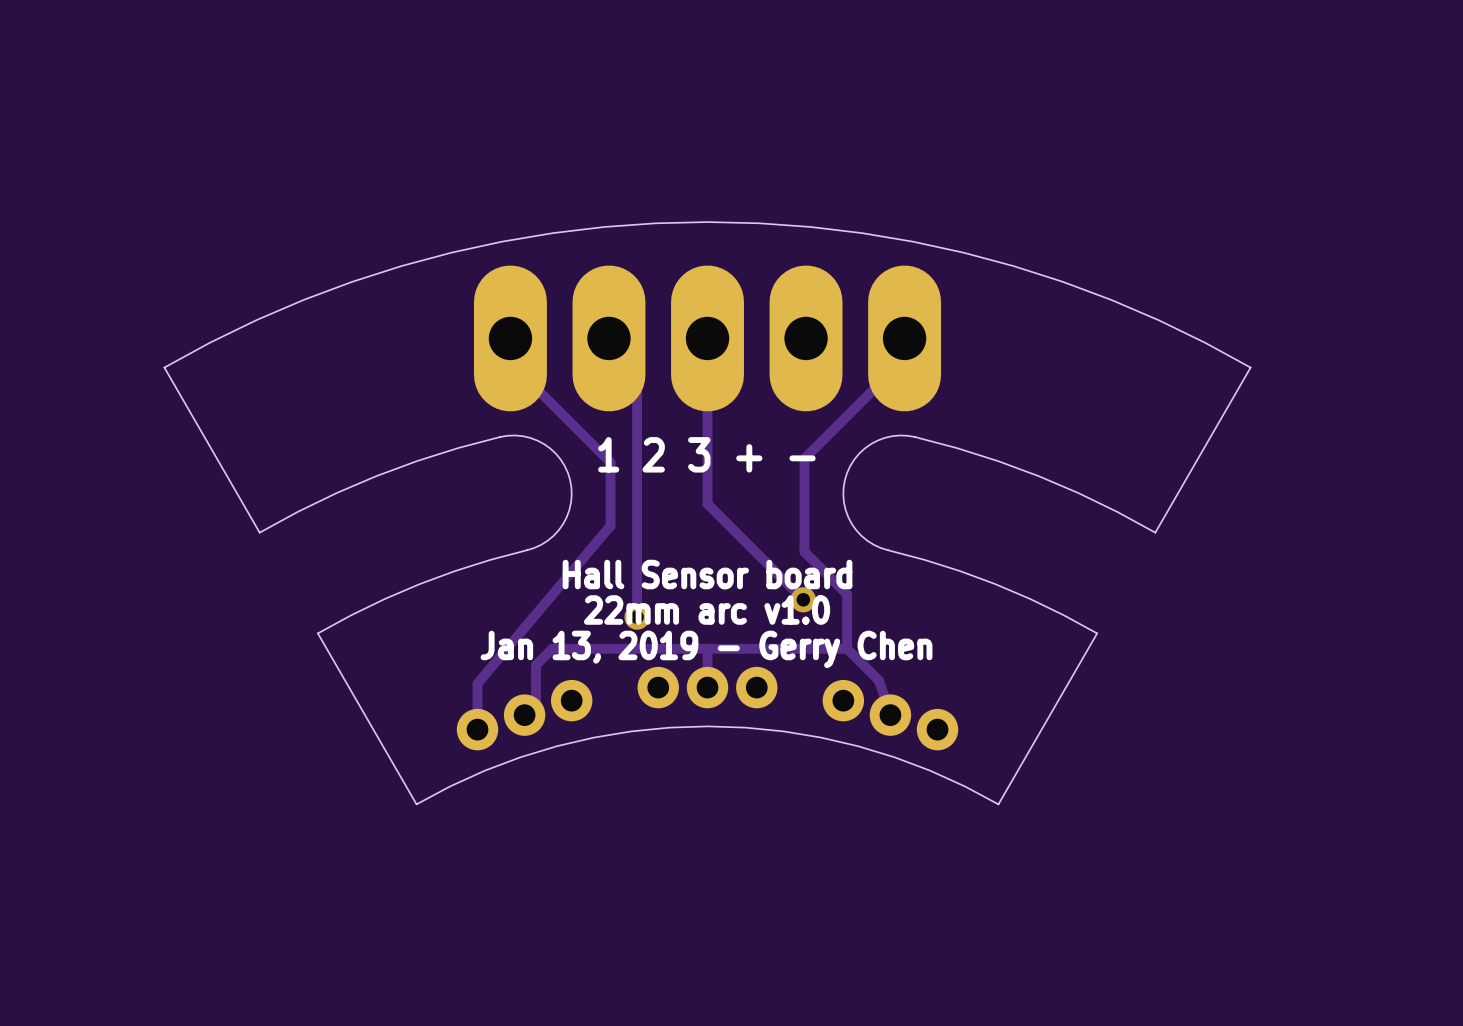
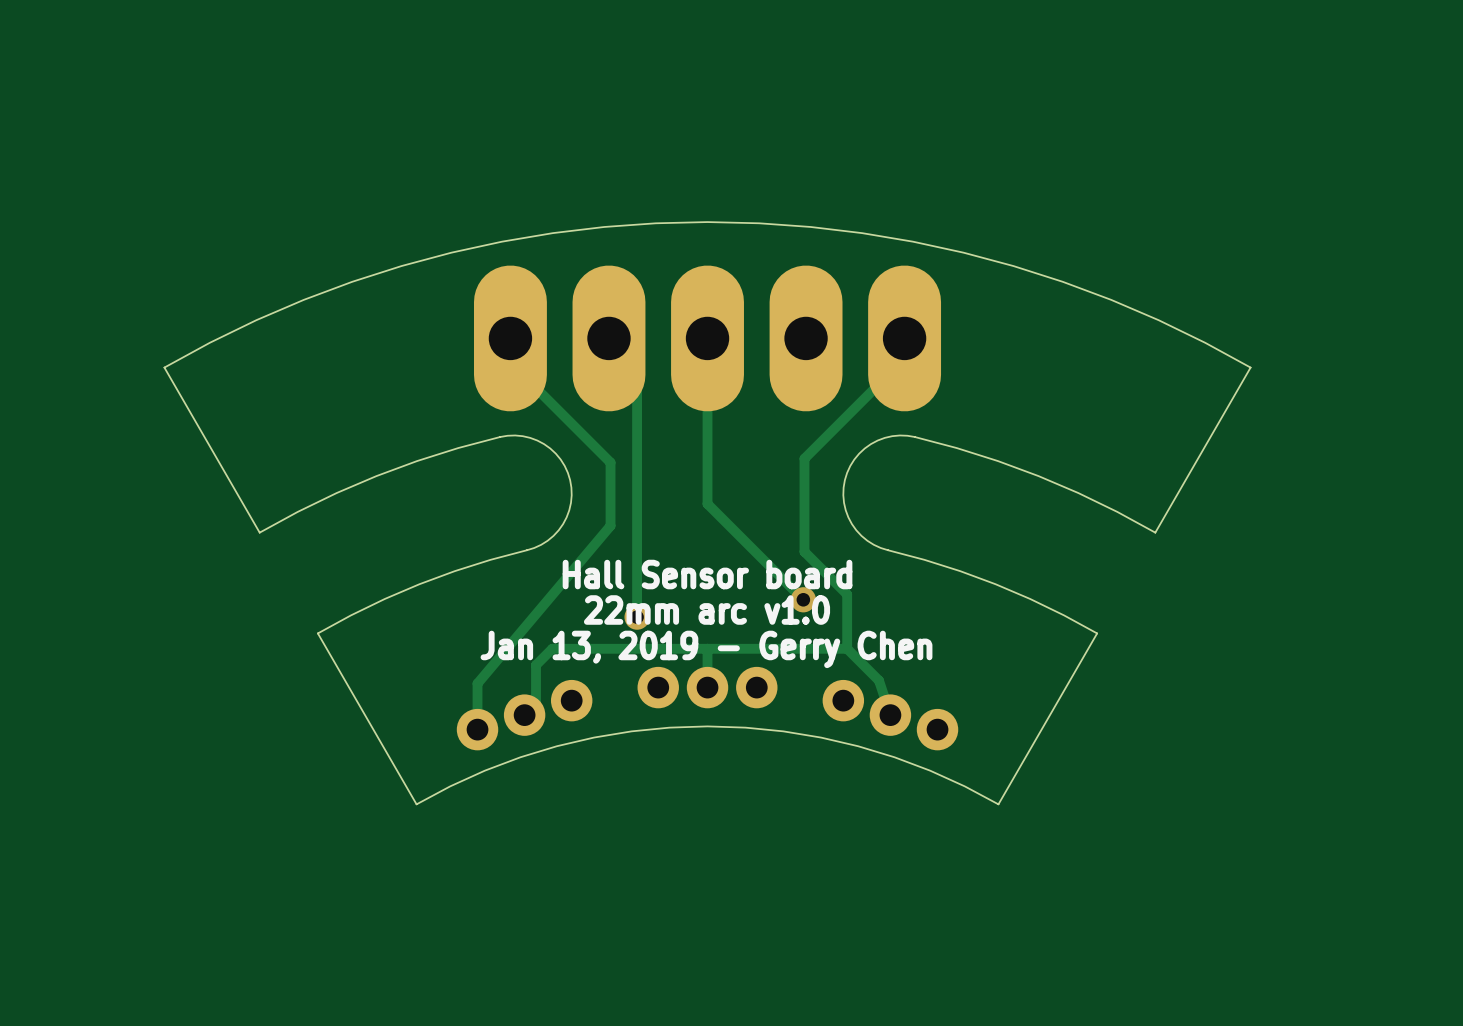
text: 1 2 3 + - (706, 454) -> none

